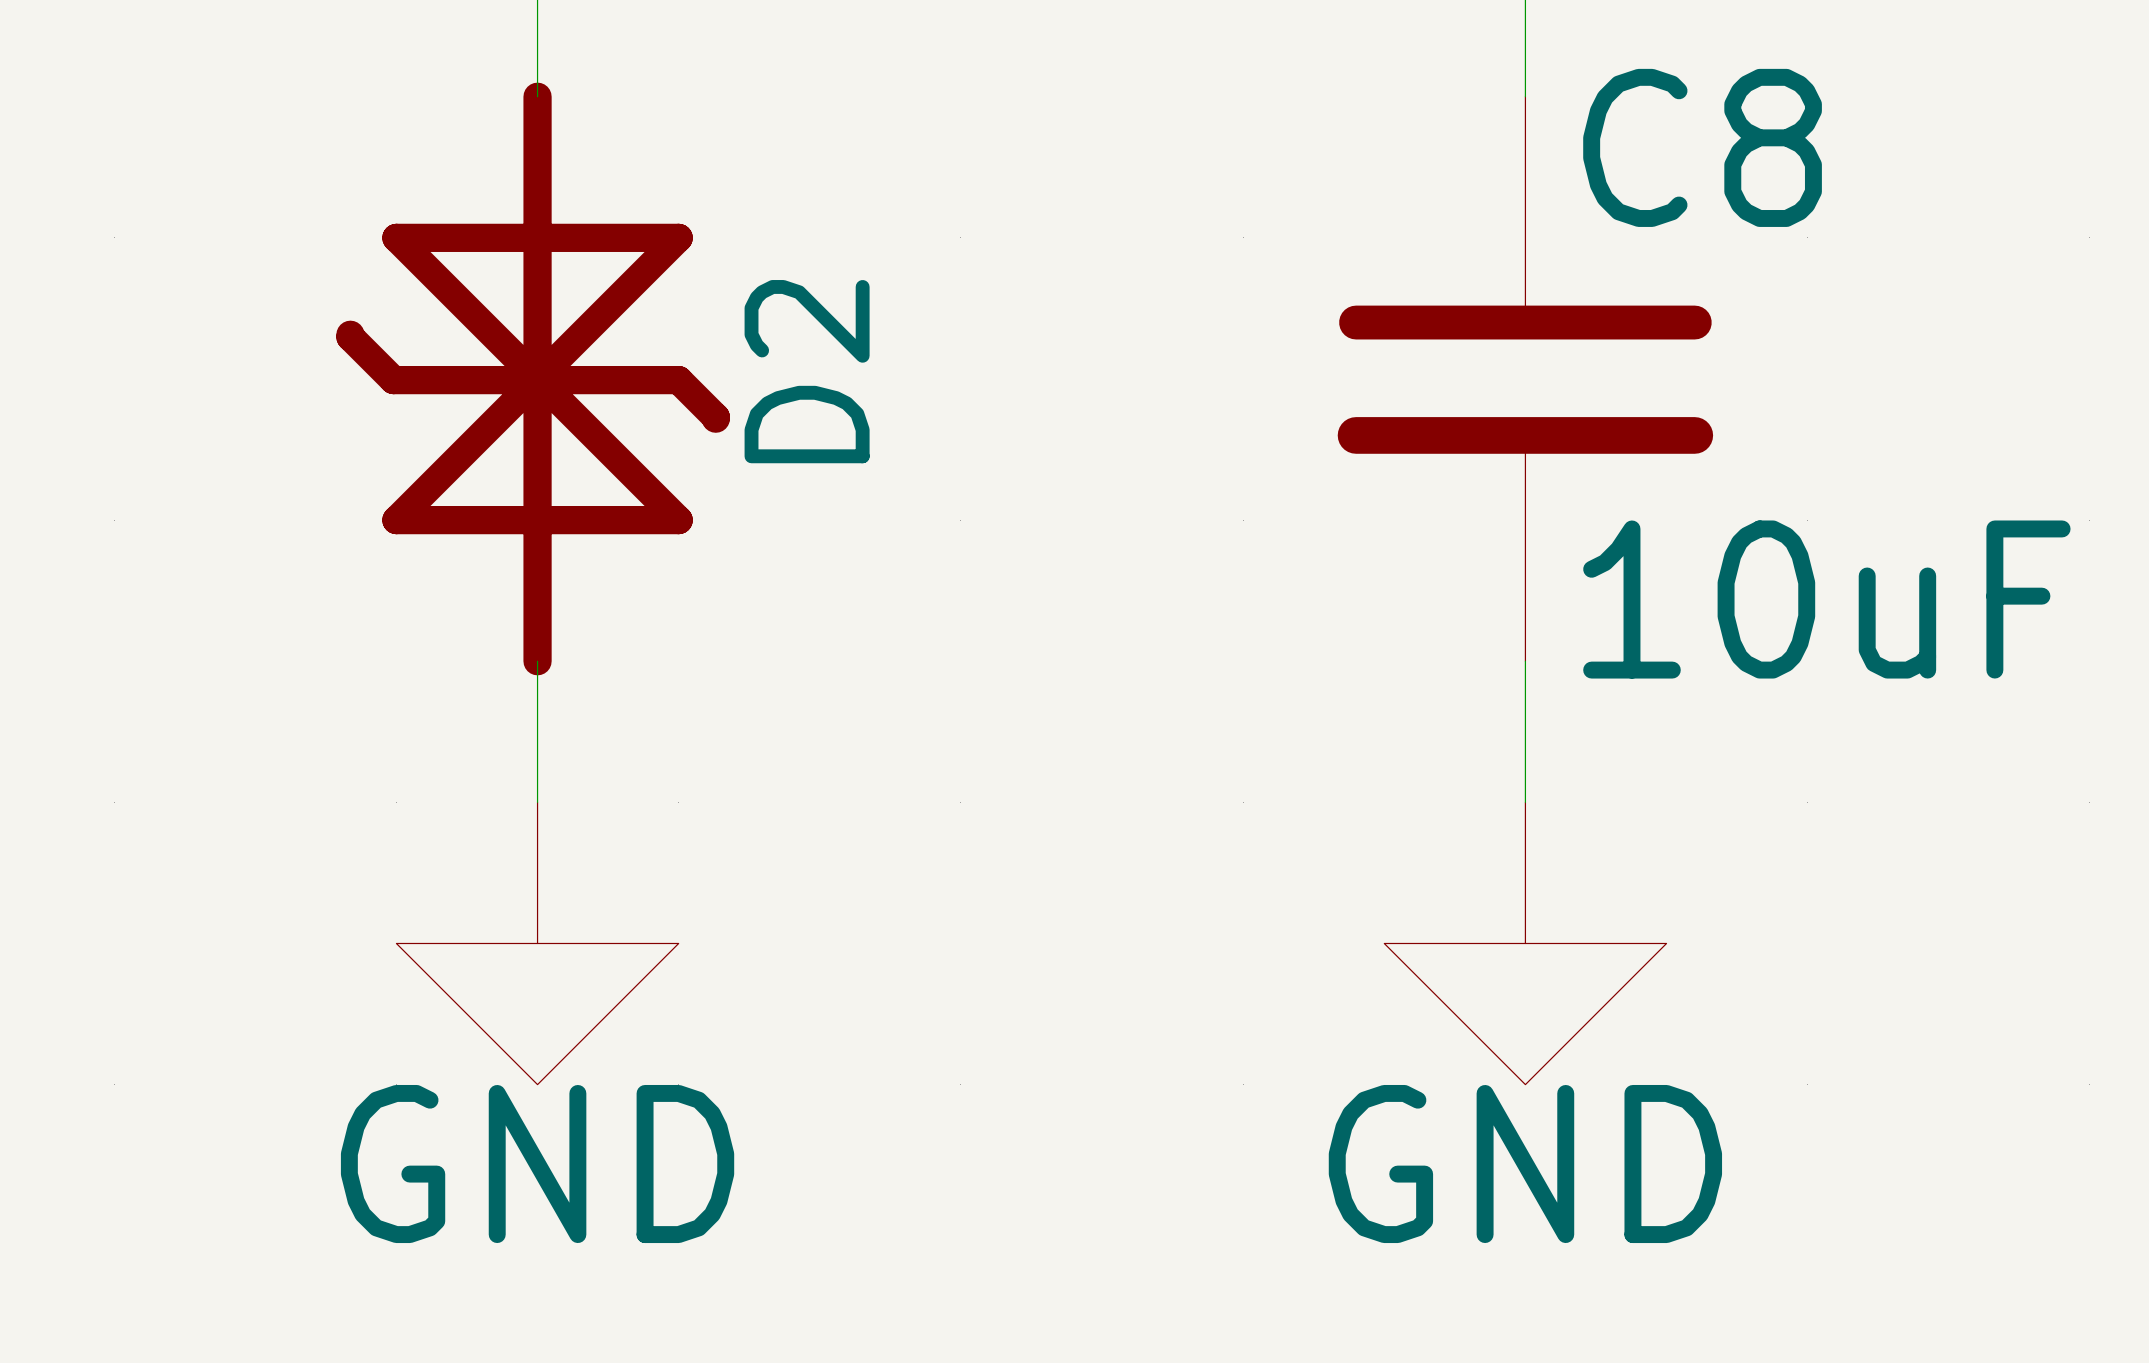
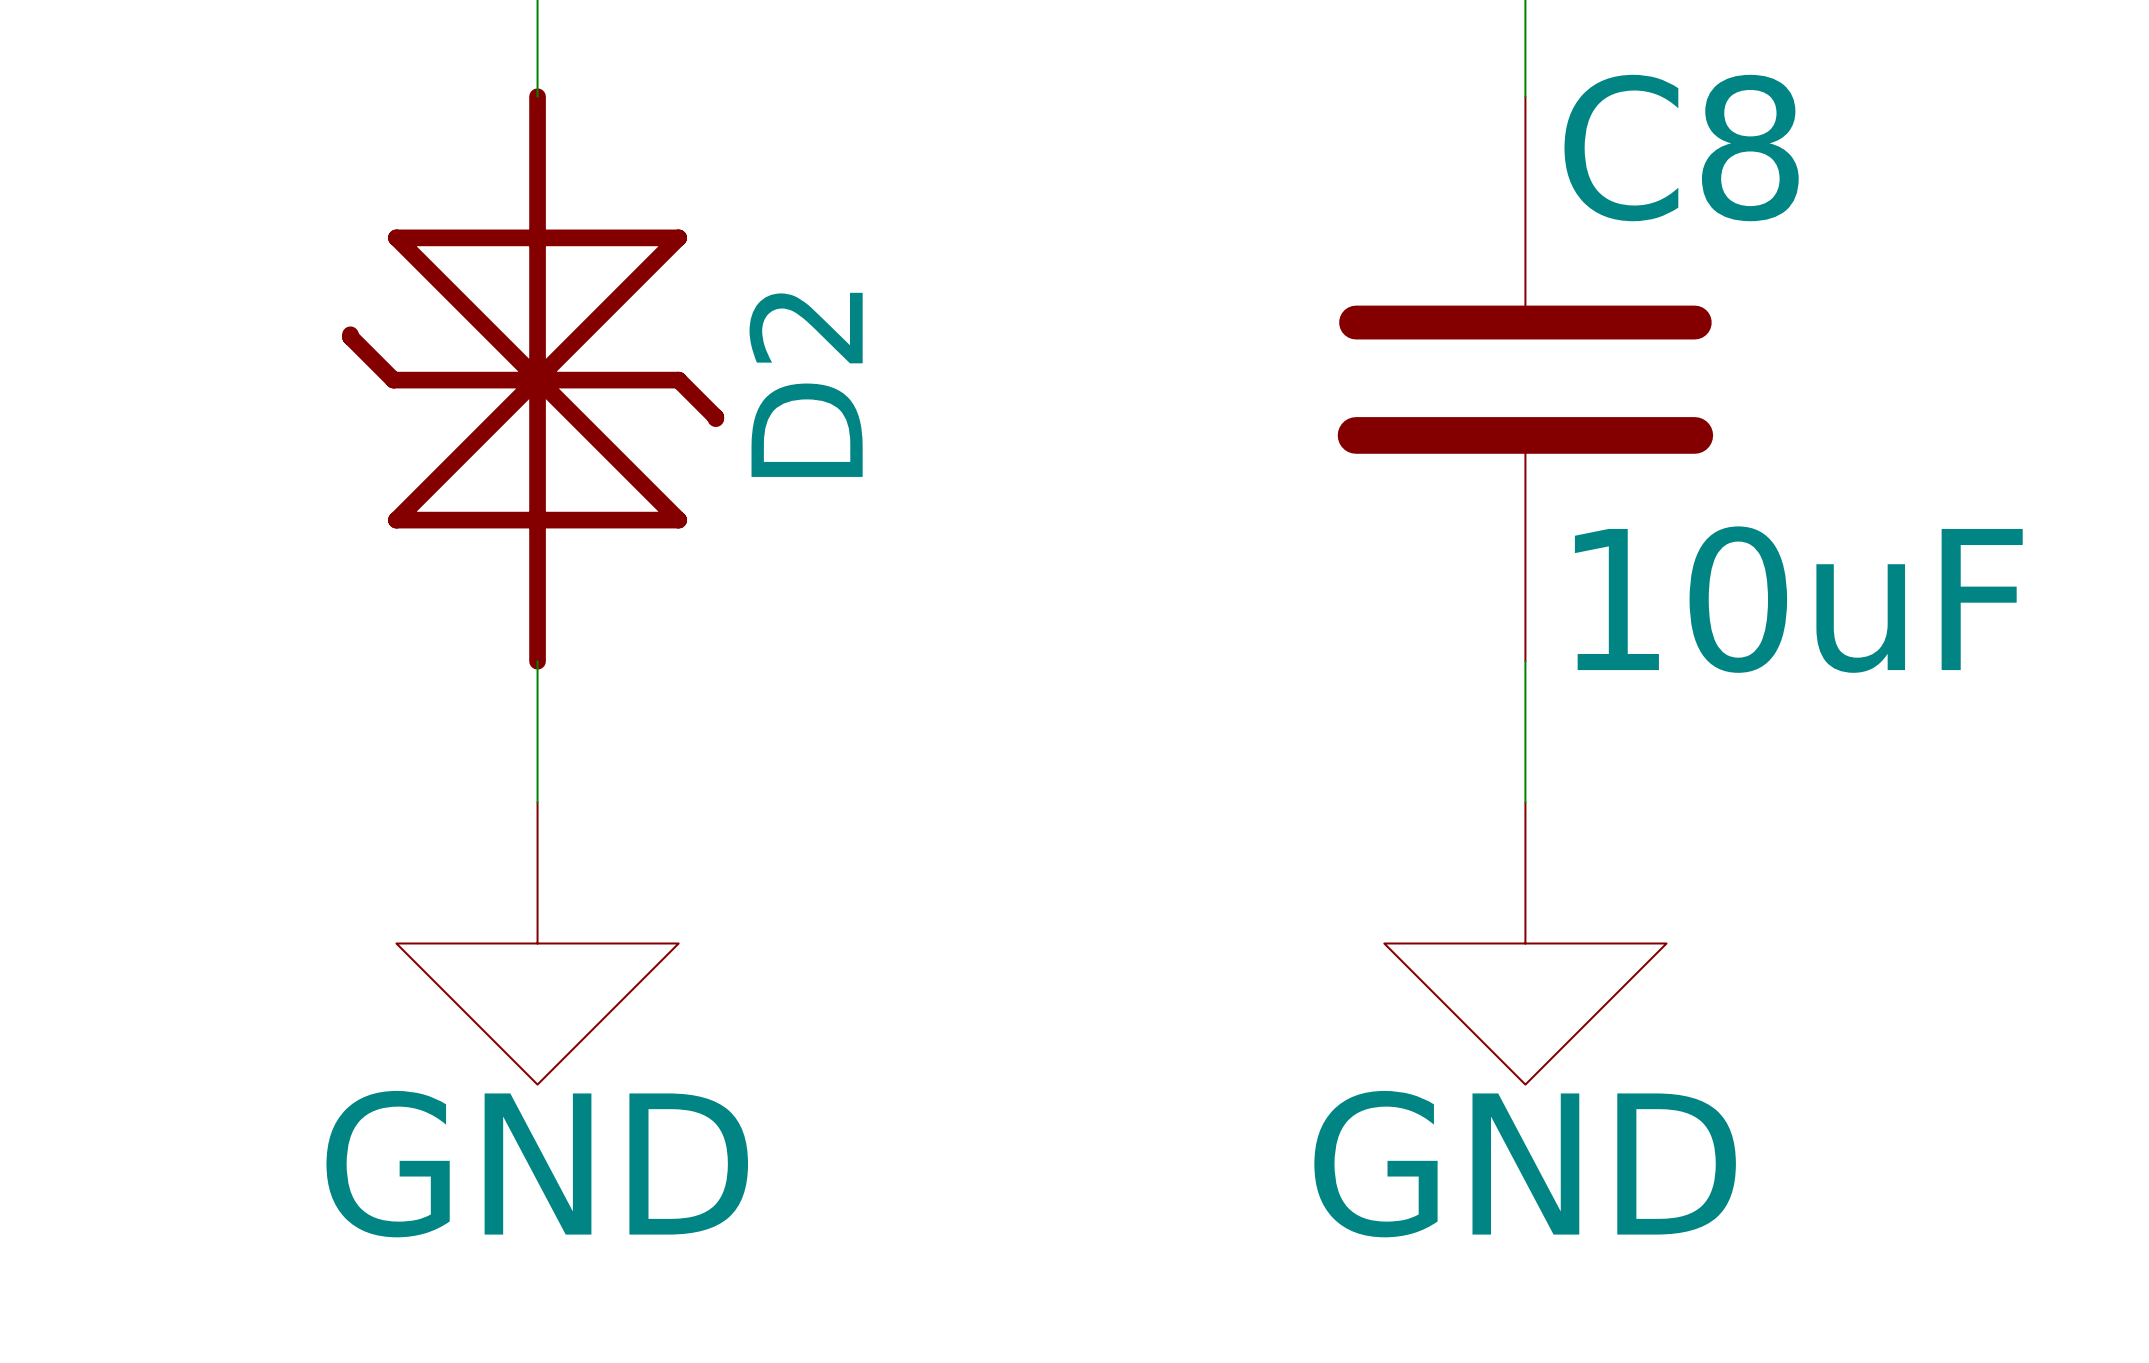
D2 symbol: [336, 82, 730, 676] -> [342, 88, 725, 670]

